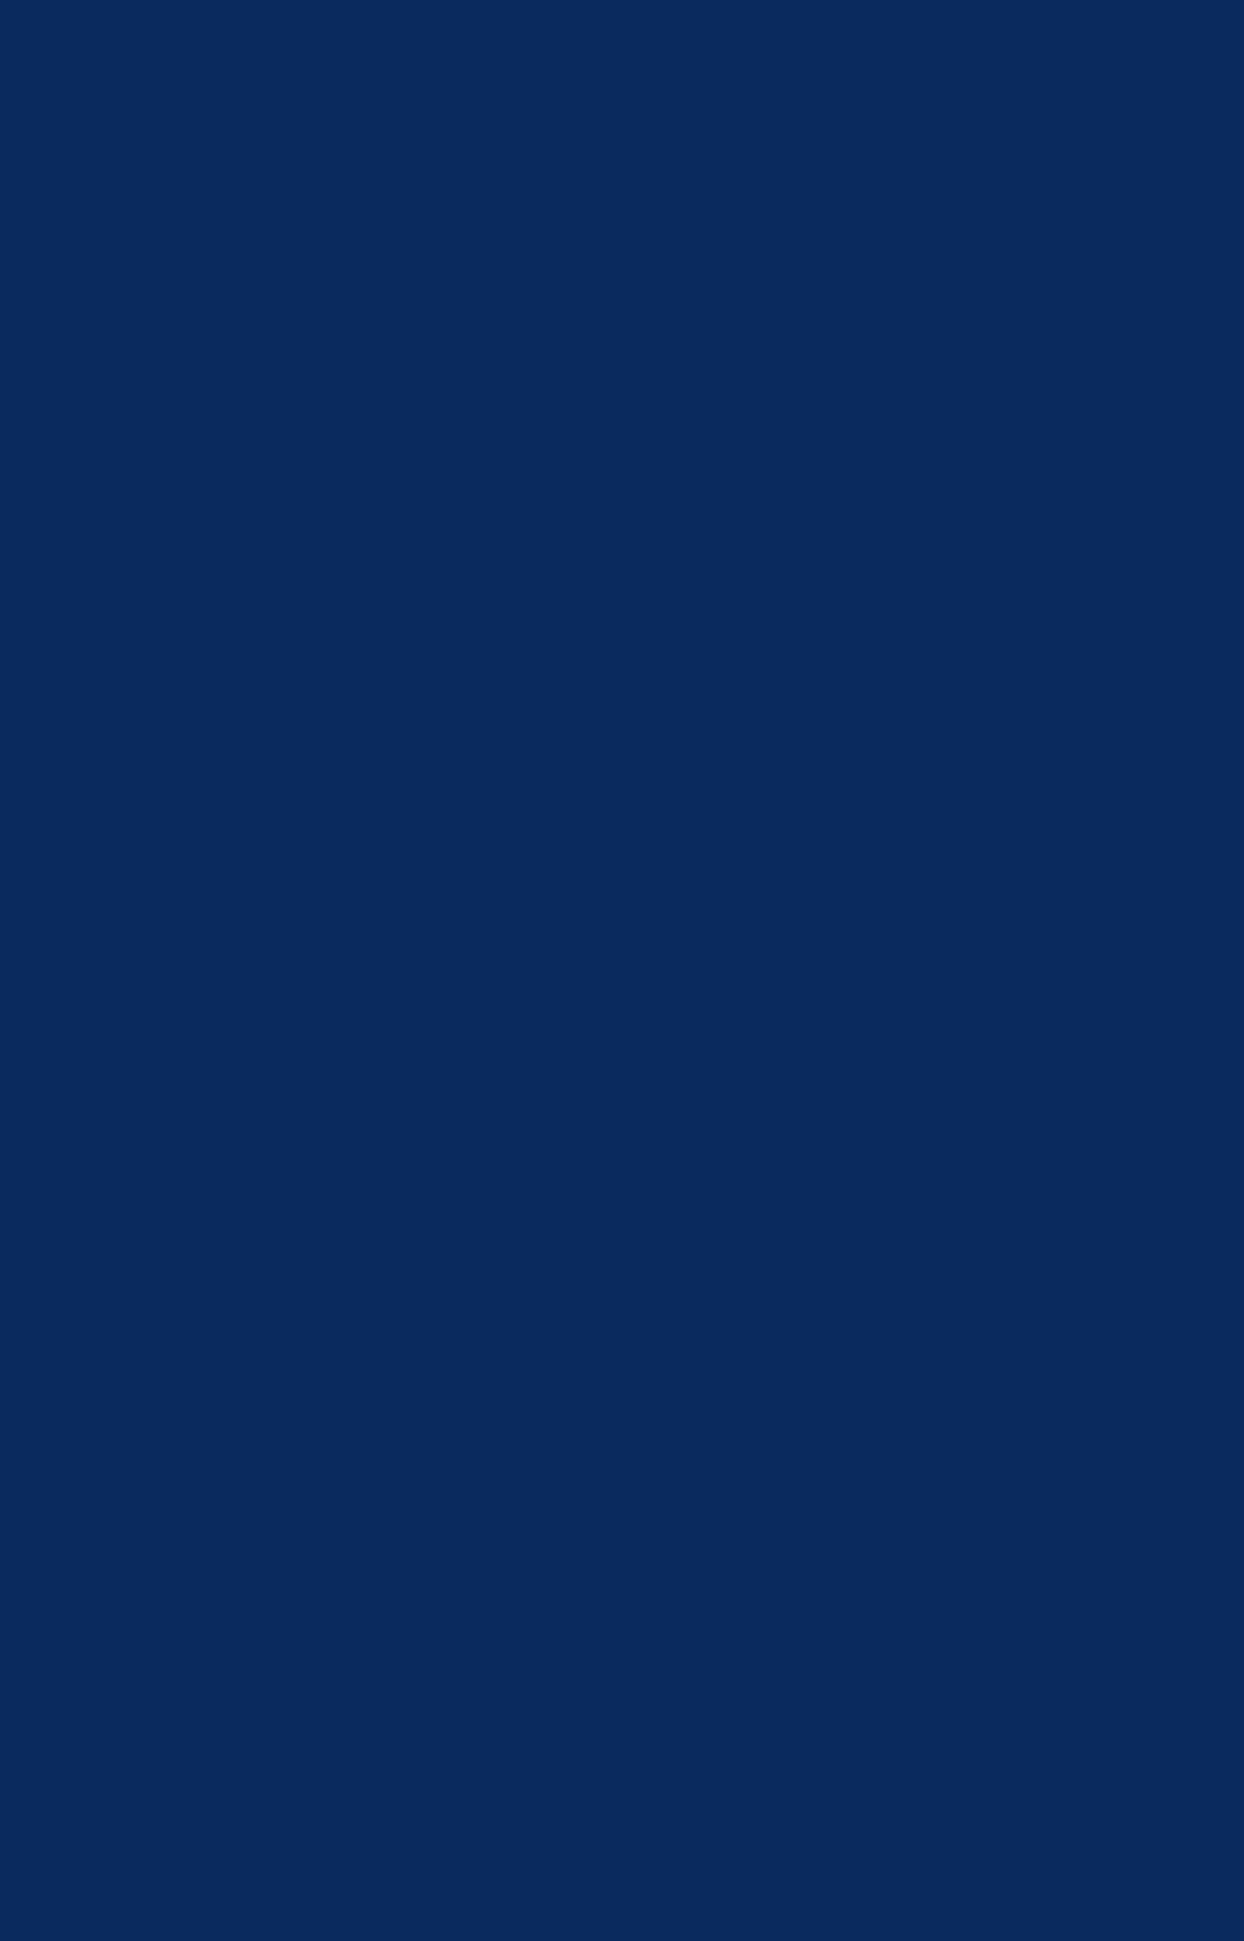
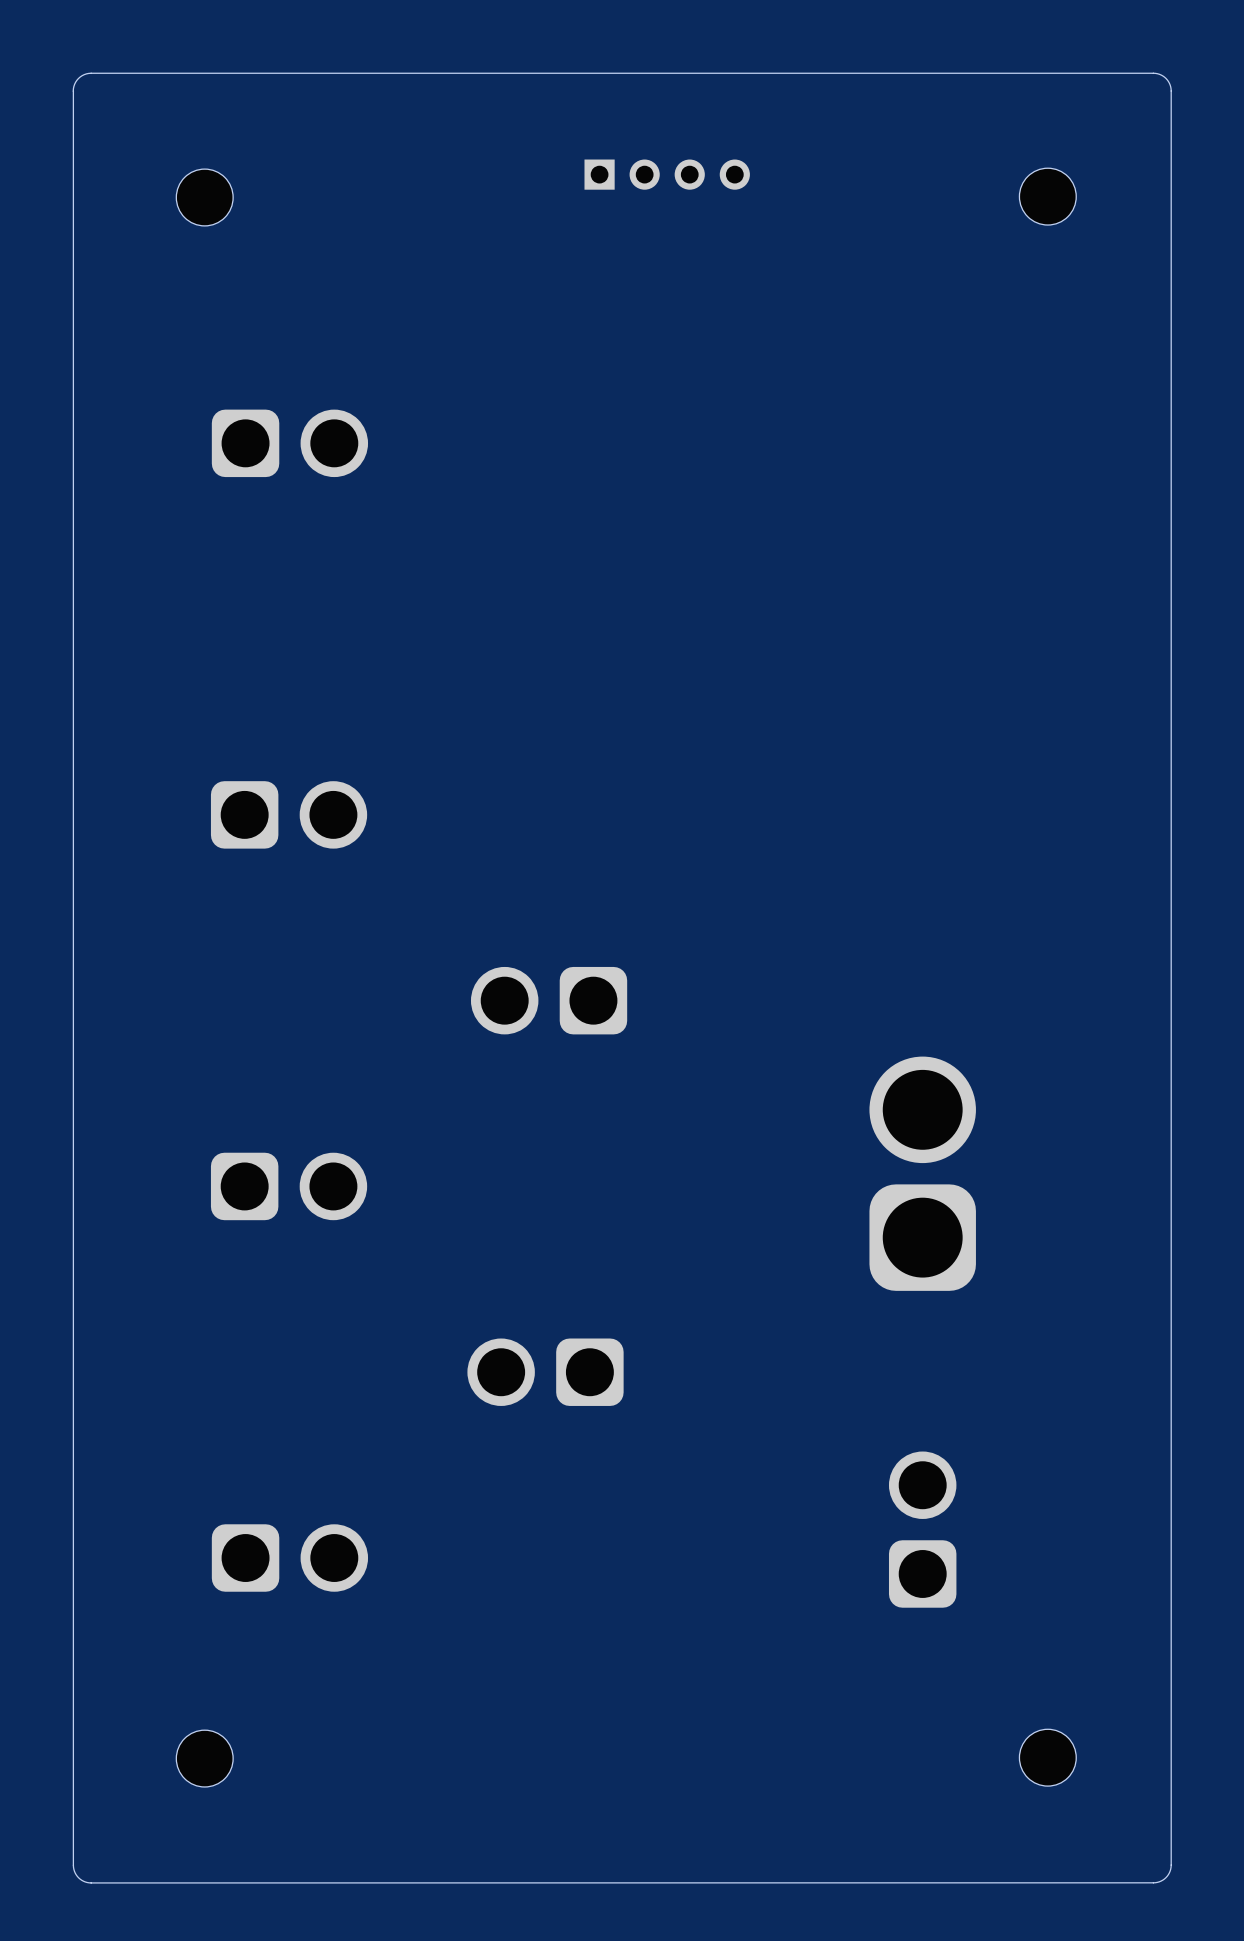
board edge: none -> (73, 91) (73, 1865) (76, 1874) (81, 1880) (91, 1882) (1153, 1882) (1162, 1880) (1168, 1874) (1171, 1865) (1171, 91) (1168, 81) (1161, 75) (1153, 73) (91, 73) (78, 78) (73, 91)
part: none -> (667, 174)
part: none -> (1047, 196)
part: none -> (204, 197)
part: none -> (289, 443)
part: none -> (289, 814)
part: none -> (549, 1000)
part: none -> (922, 1173)
part: none -> (289, 1186)
part: none -> (545, 1372)
part: none -> (922, 1529)
part: none -> (289, 1558)
part: none -> (1047, 1757)
part: none -> (204, 1758)

